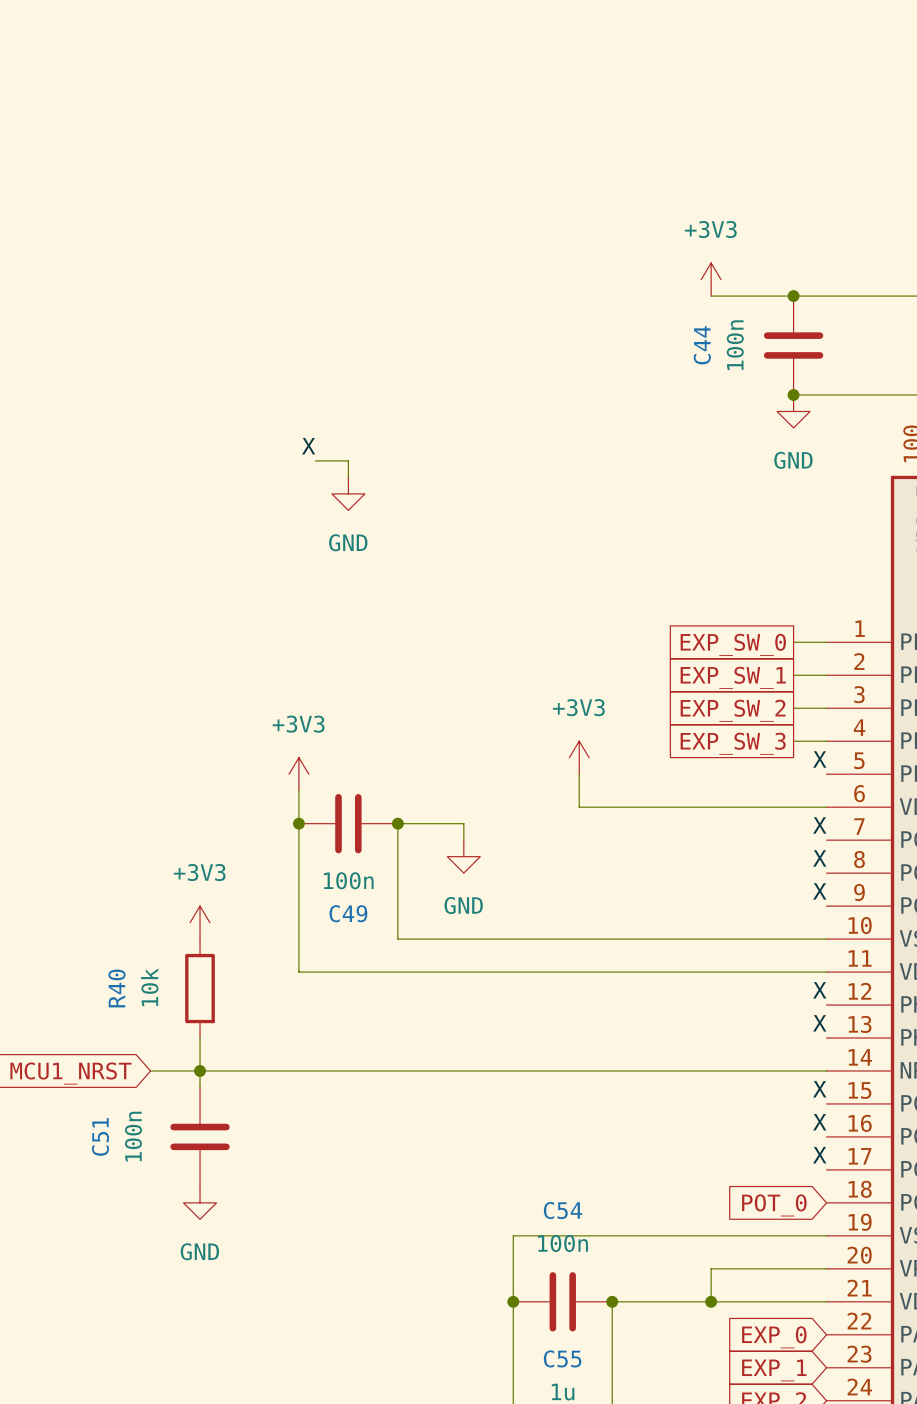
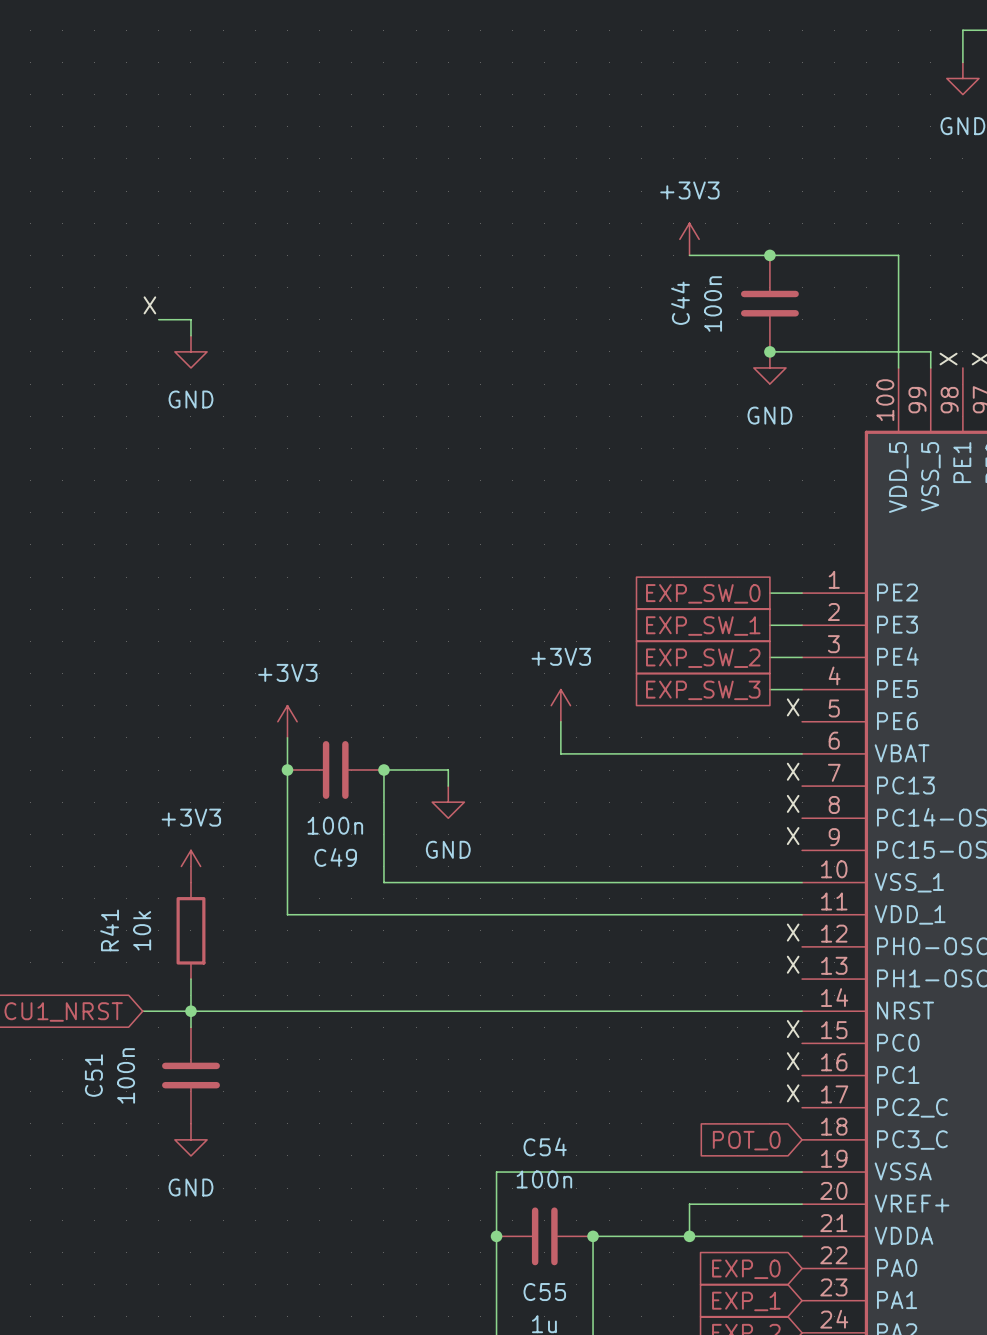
label position: X (308, 446) -> X (149, 305)
wire: (315, 460) (348, 460) (348, 477) -> (158, 319) (190, 319) (190, 335)
power symbol position: GND (348, 493) -> GND (190, 351)
R40 name: R40 (116, 988) -> R41 (109, 930)

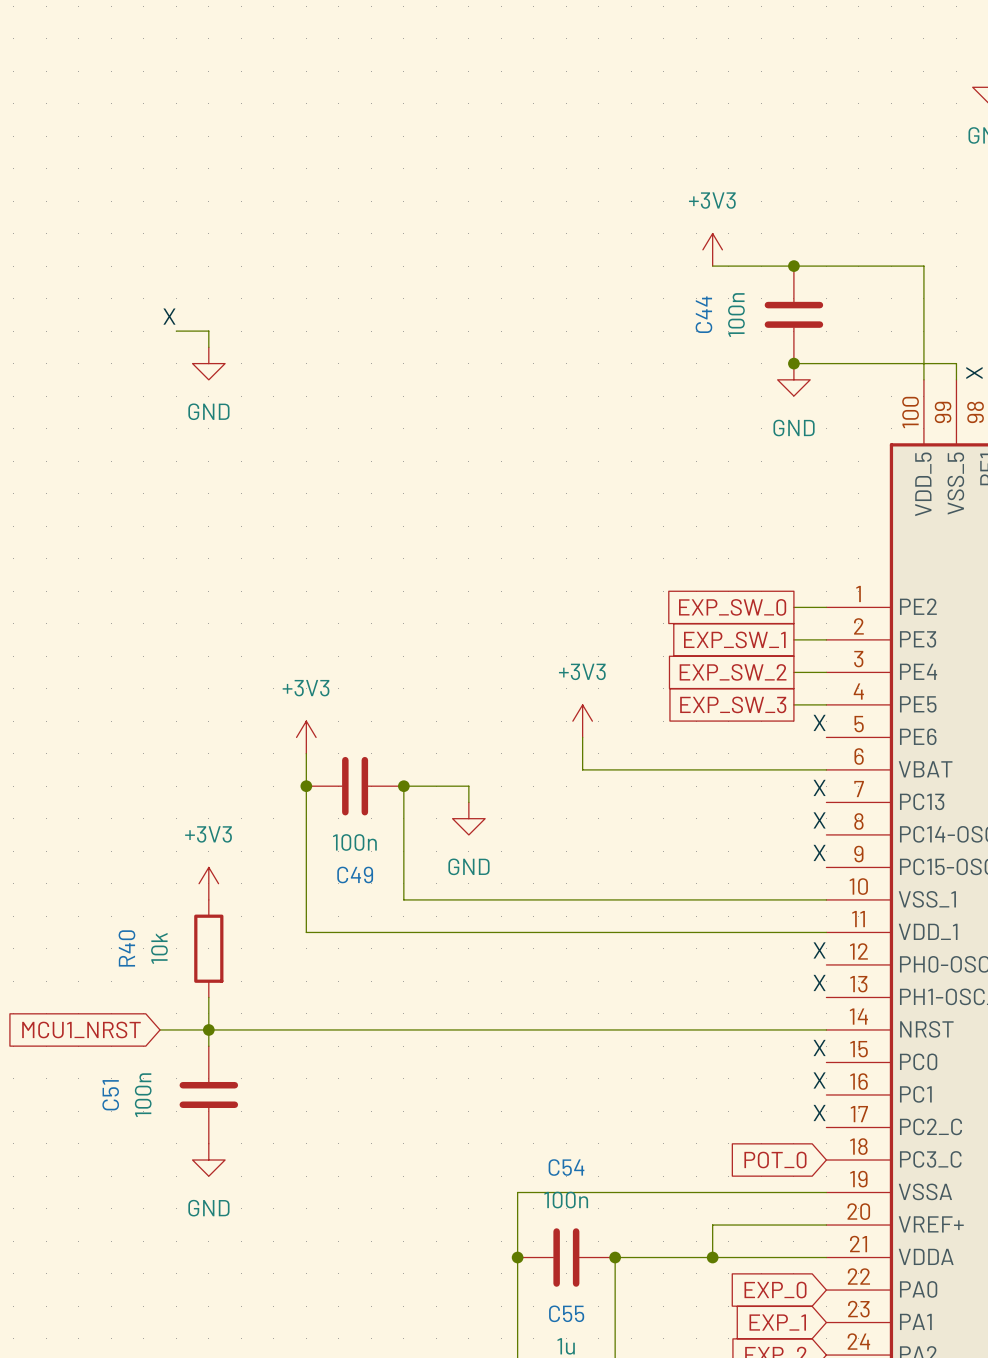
R41 name: R41 (109, 930) -> R40 (126, 948)

